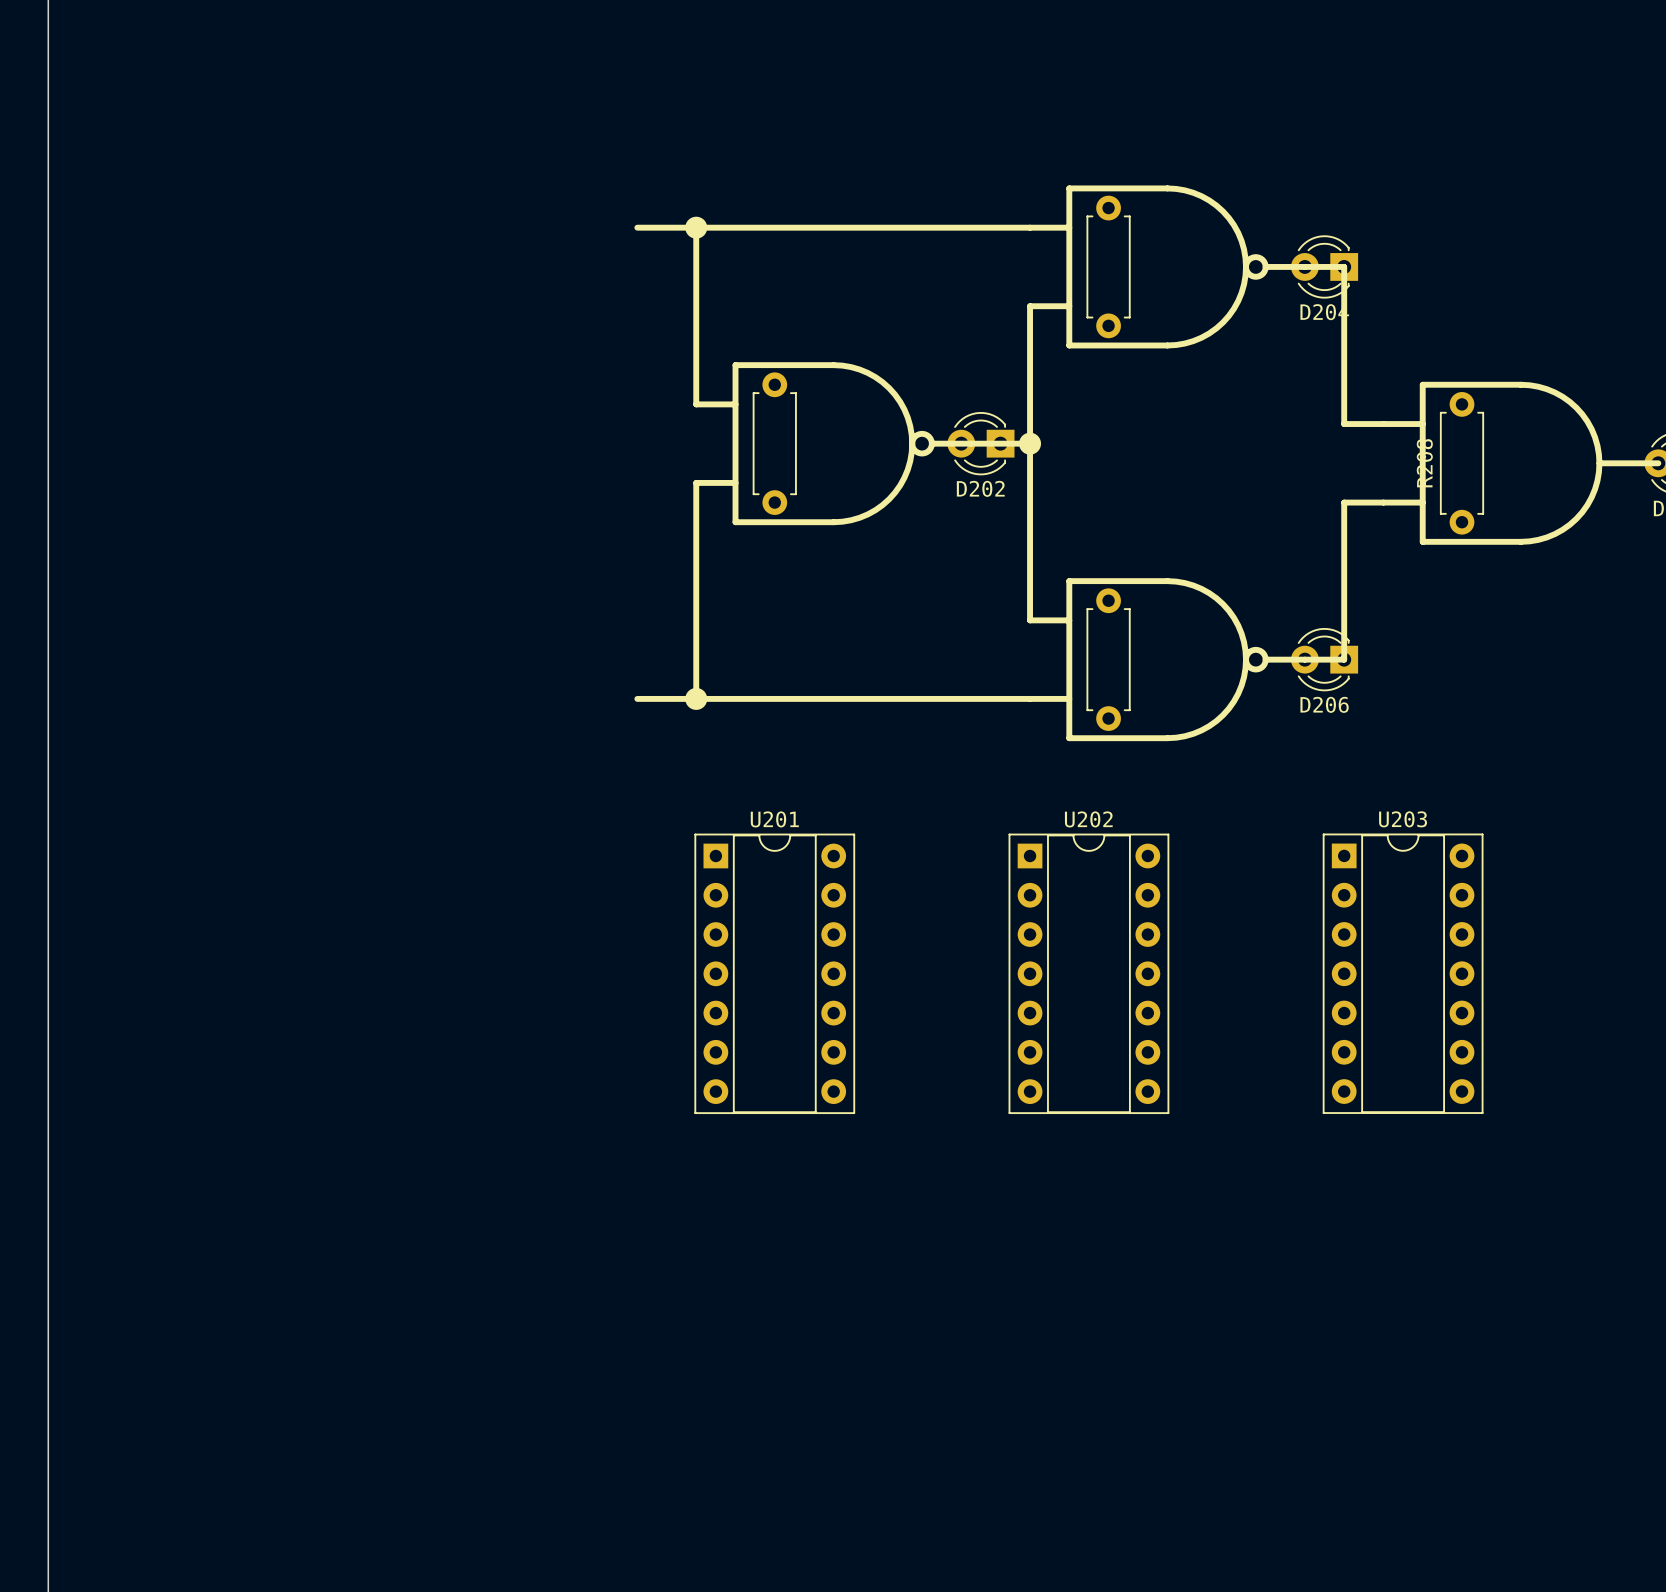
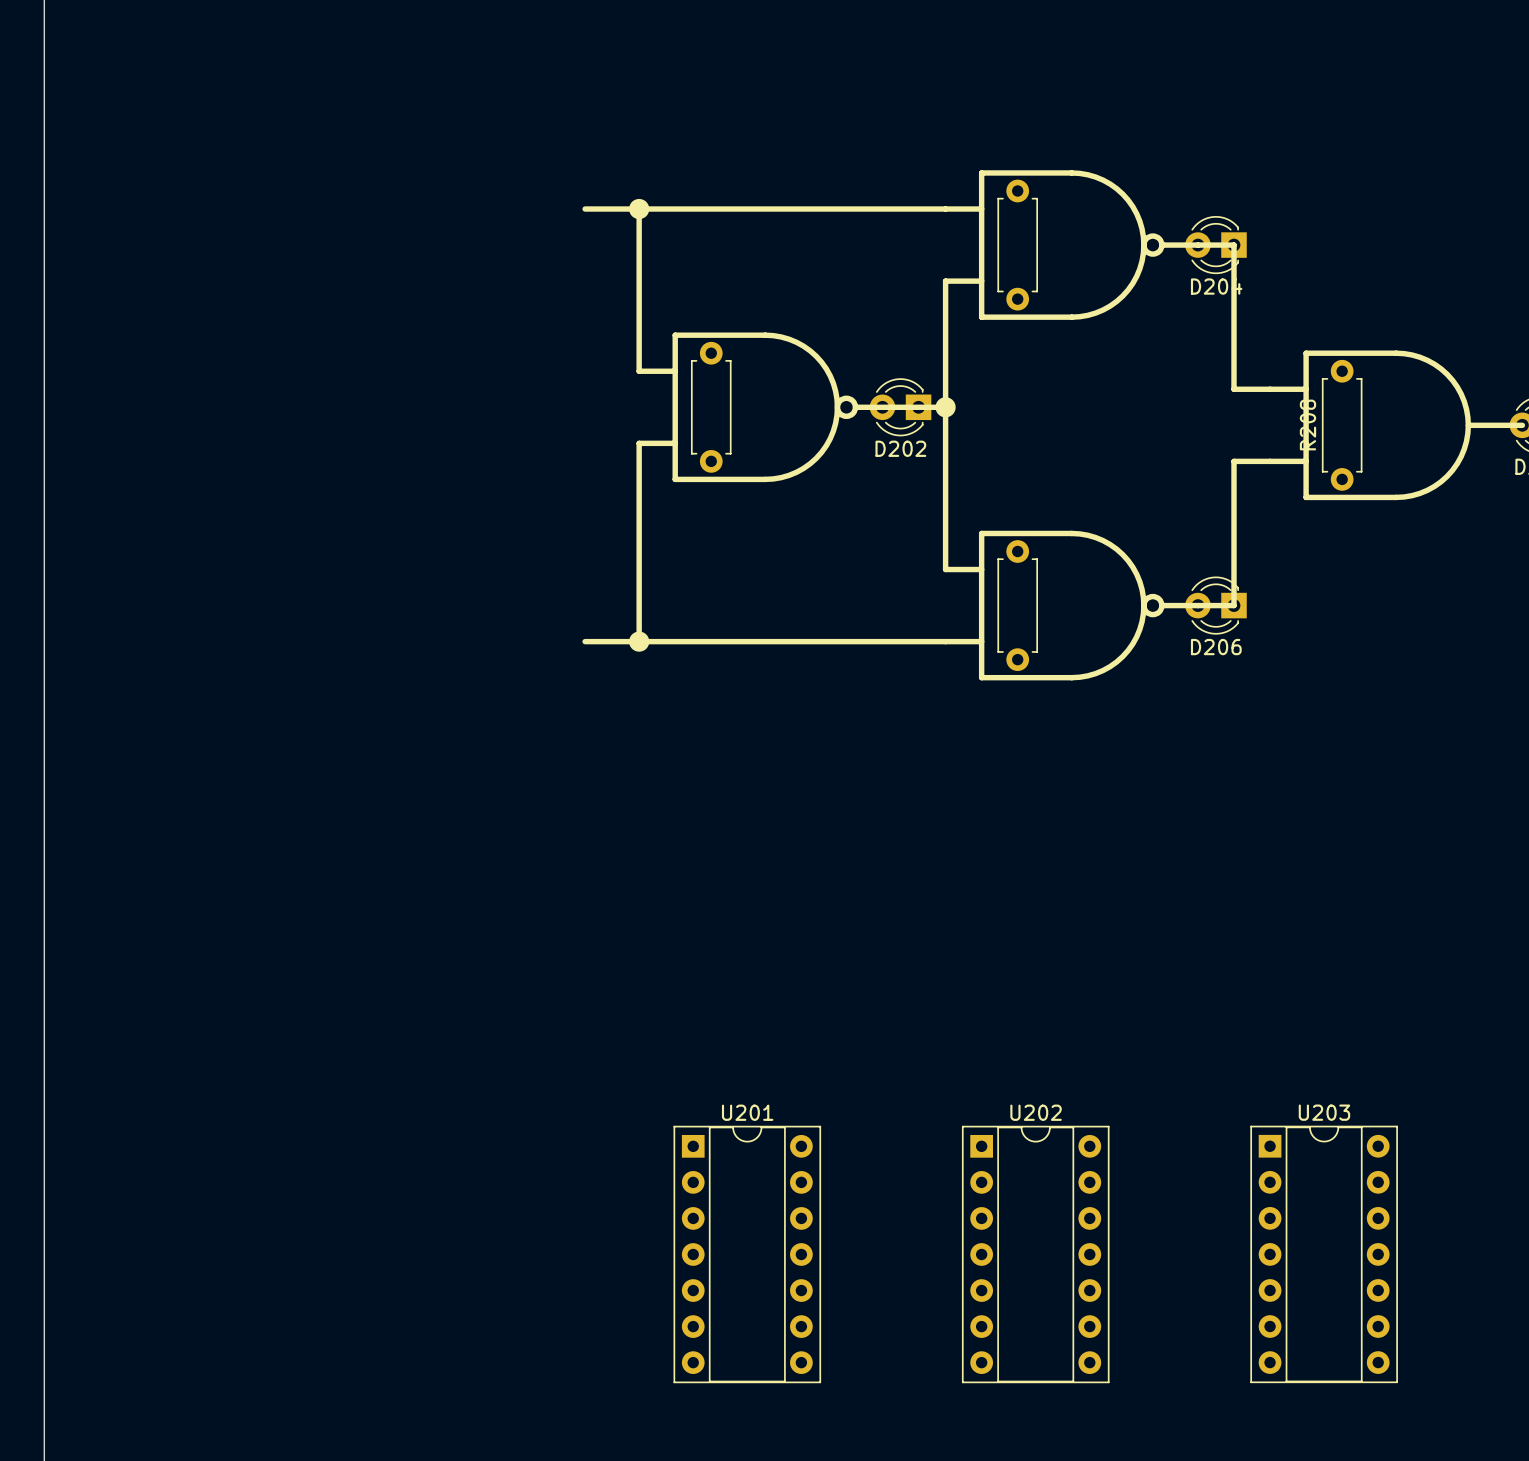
U201 position: (774, 973) -> (747, 1254)
U202 position: (1088, 973) -> (1035, 1254)
U203 position: (1403, 973) -> (1324, 1254)

